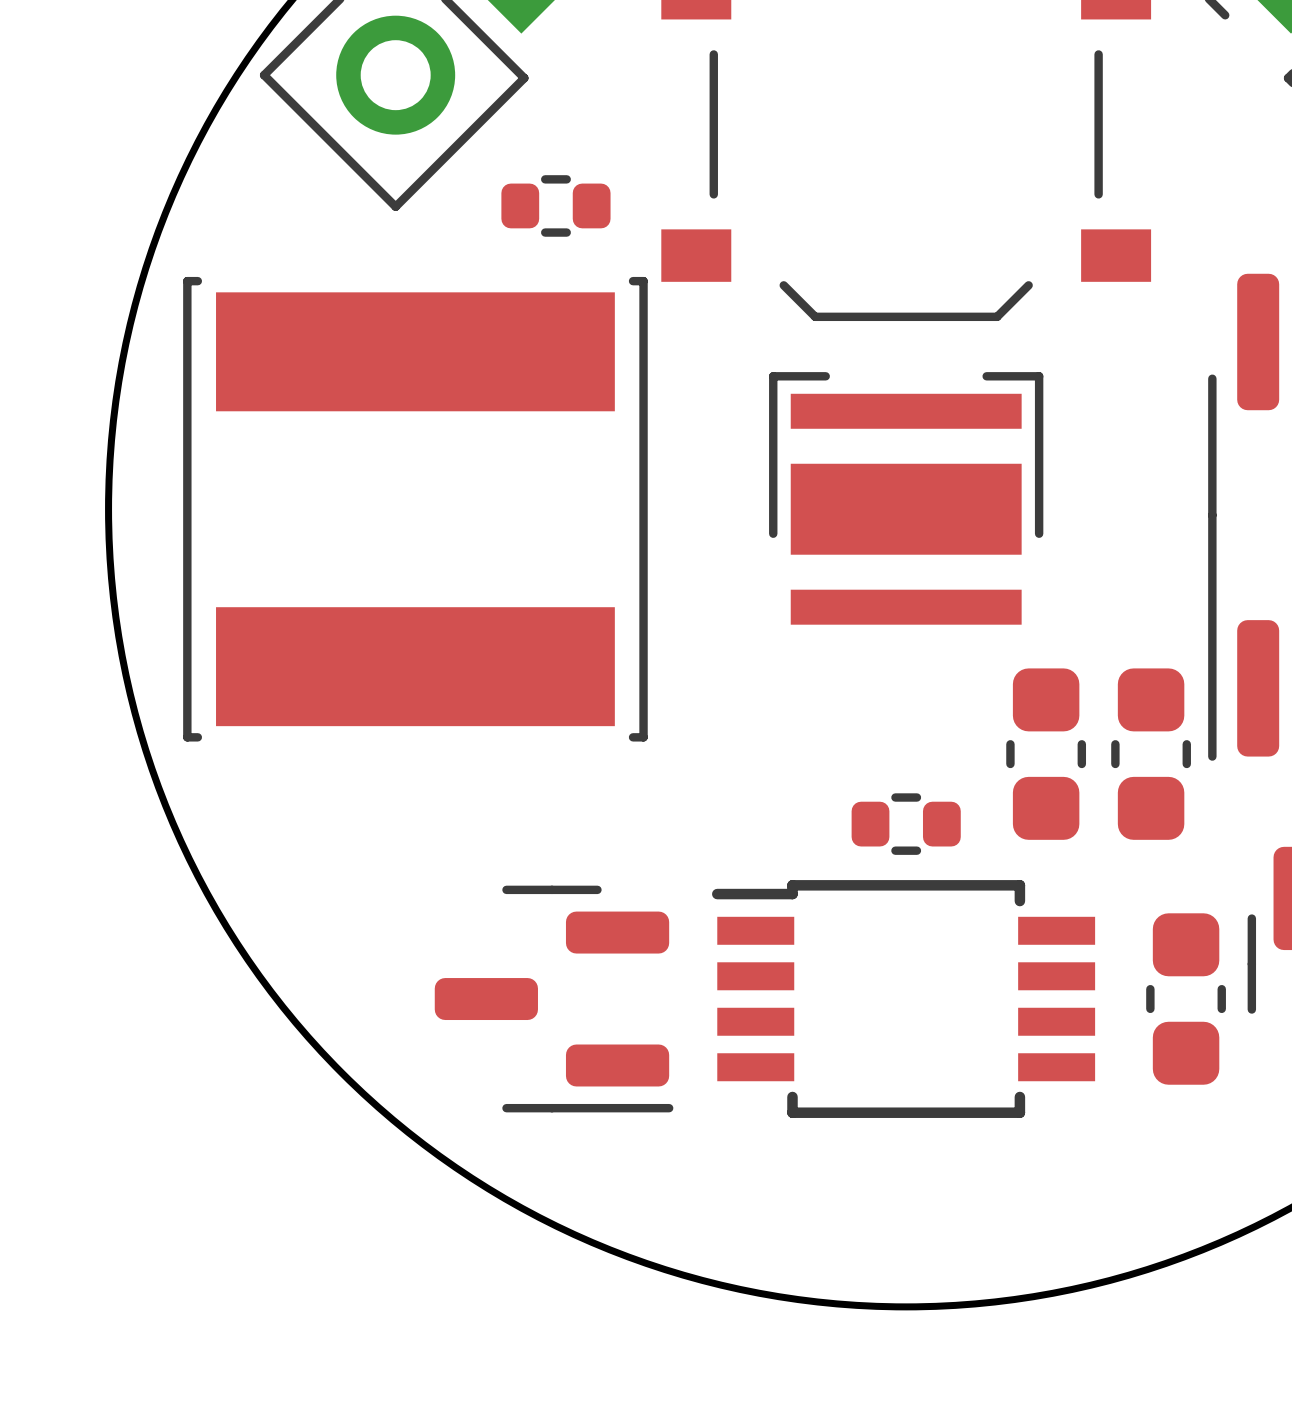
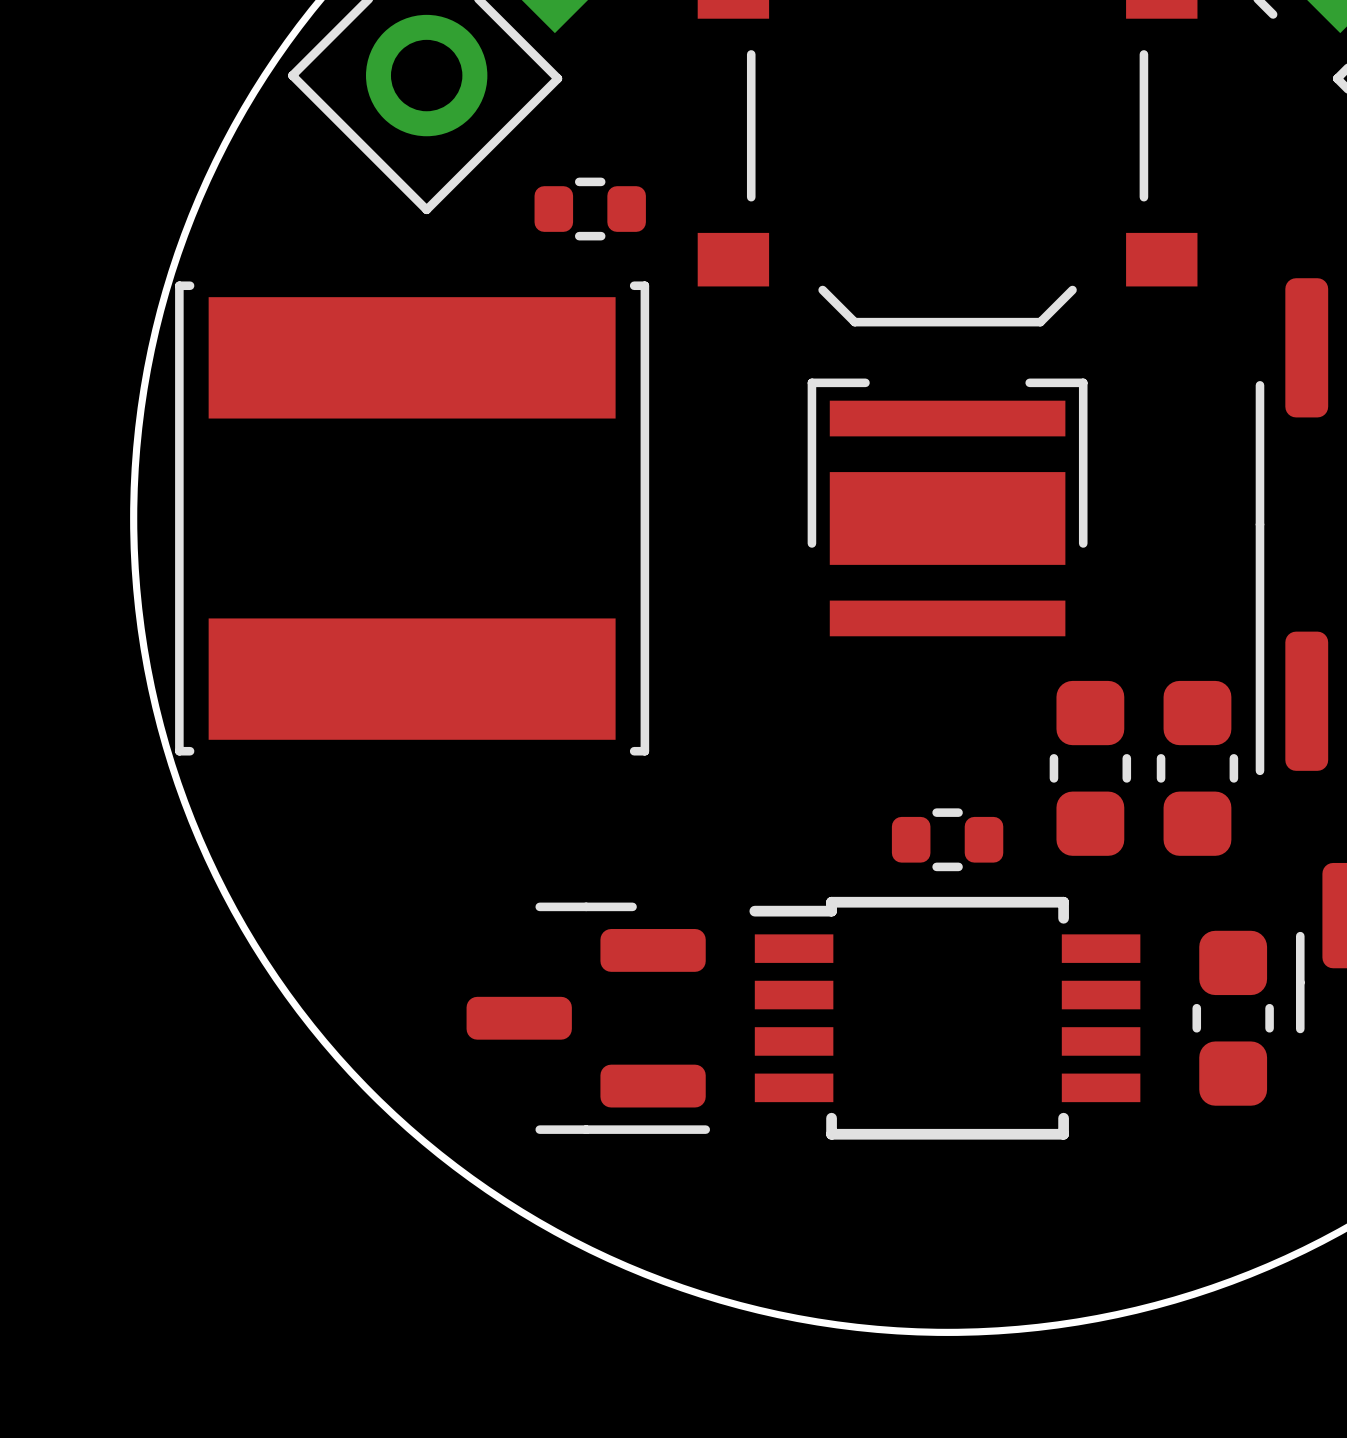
part position: (415, 509) -> (412, 518)

